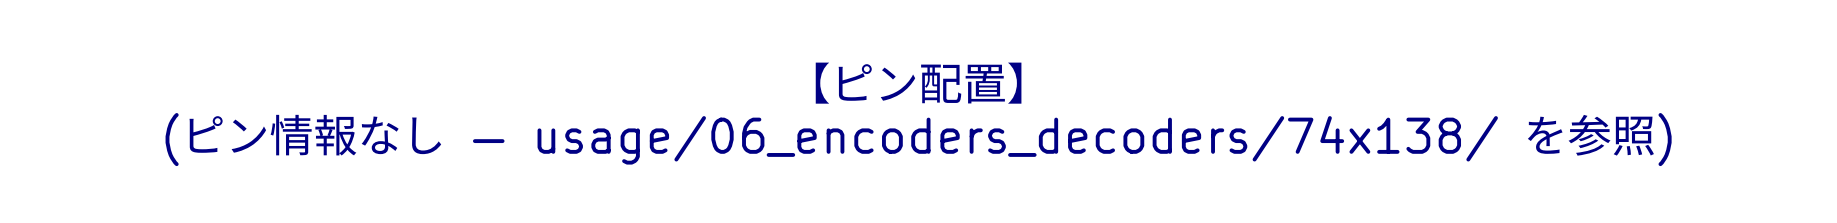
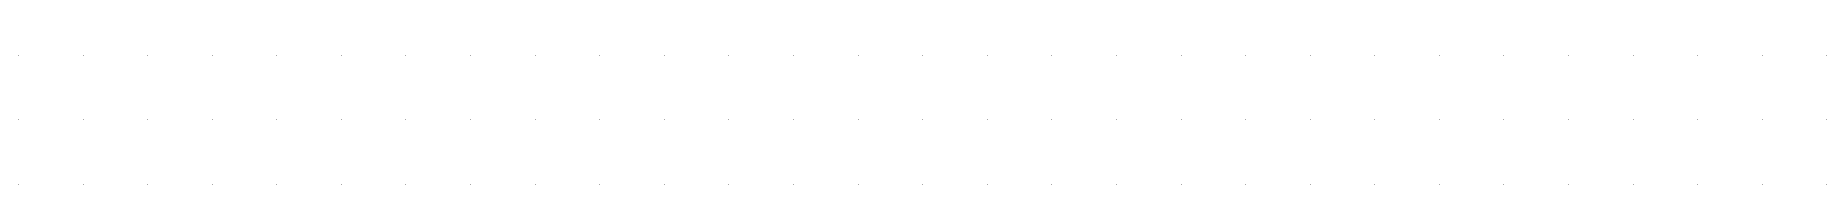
text: 【ピン配置】 (918, 83) -> none
text: (ピン情報なし — usage/06_encoders_decoders/74x138/ を参照) (918, 139) -> none

